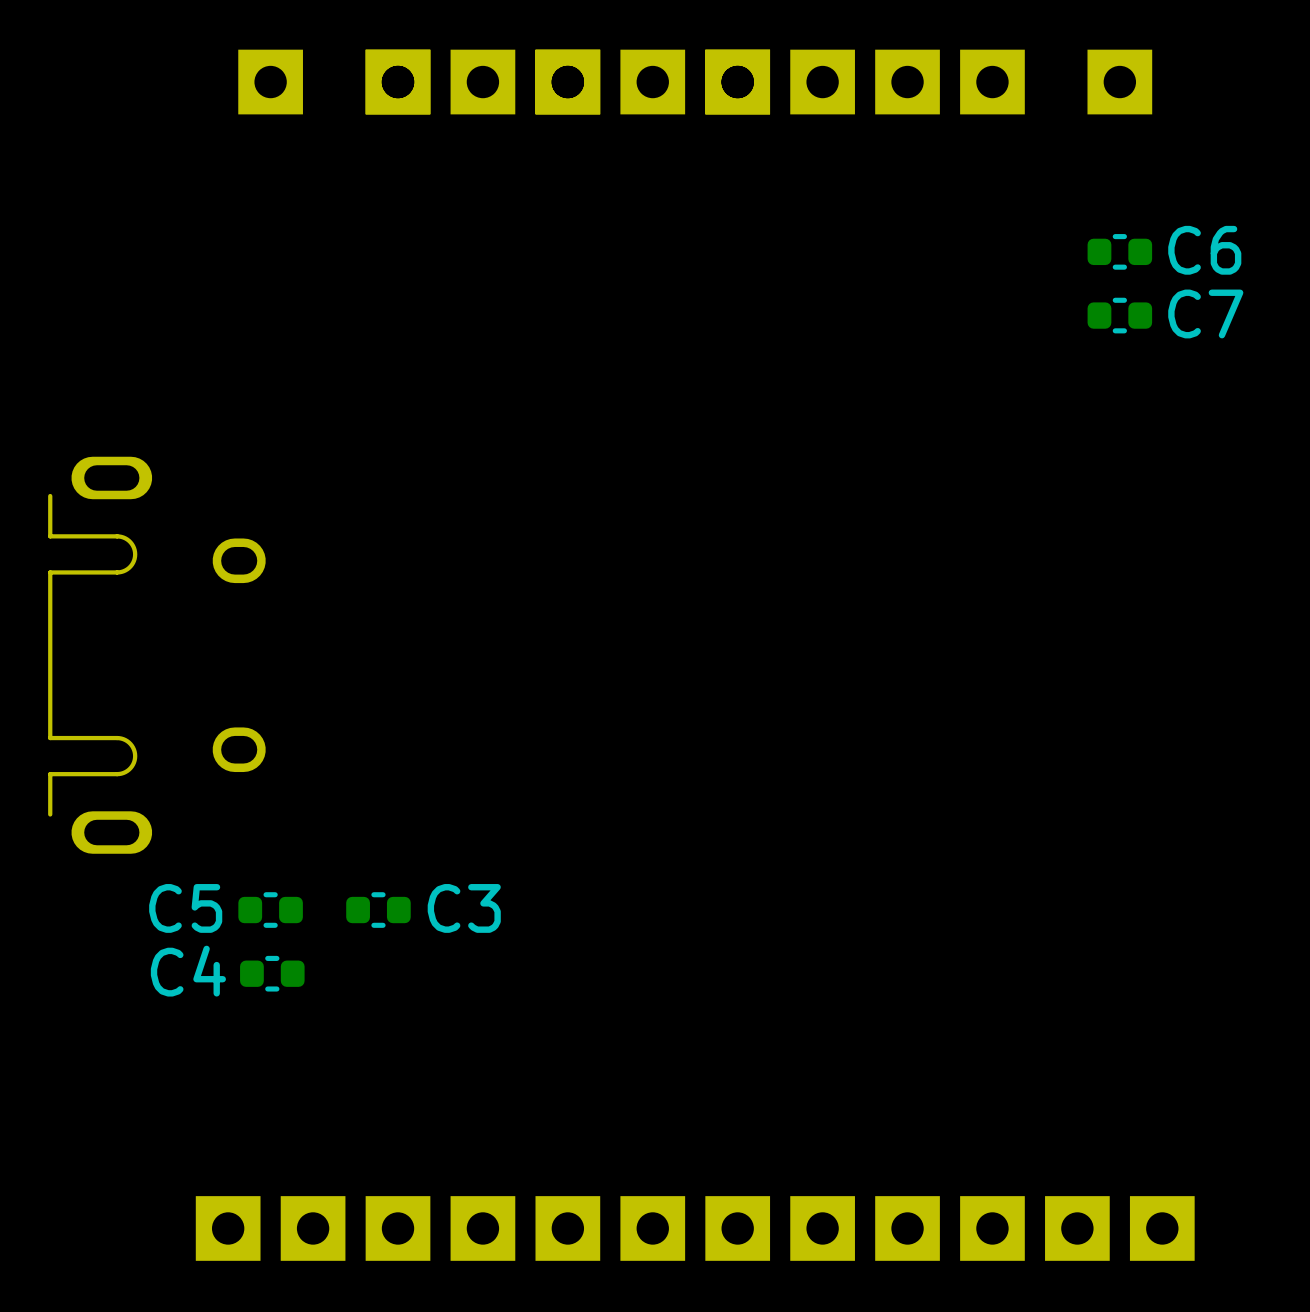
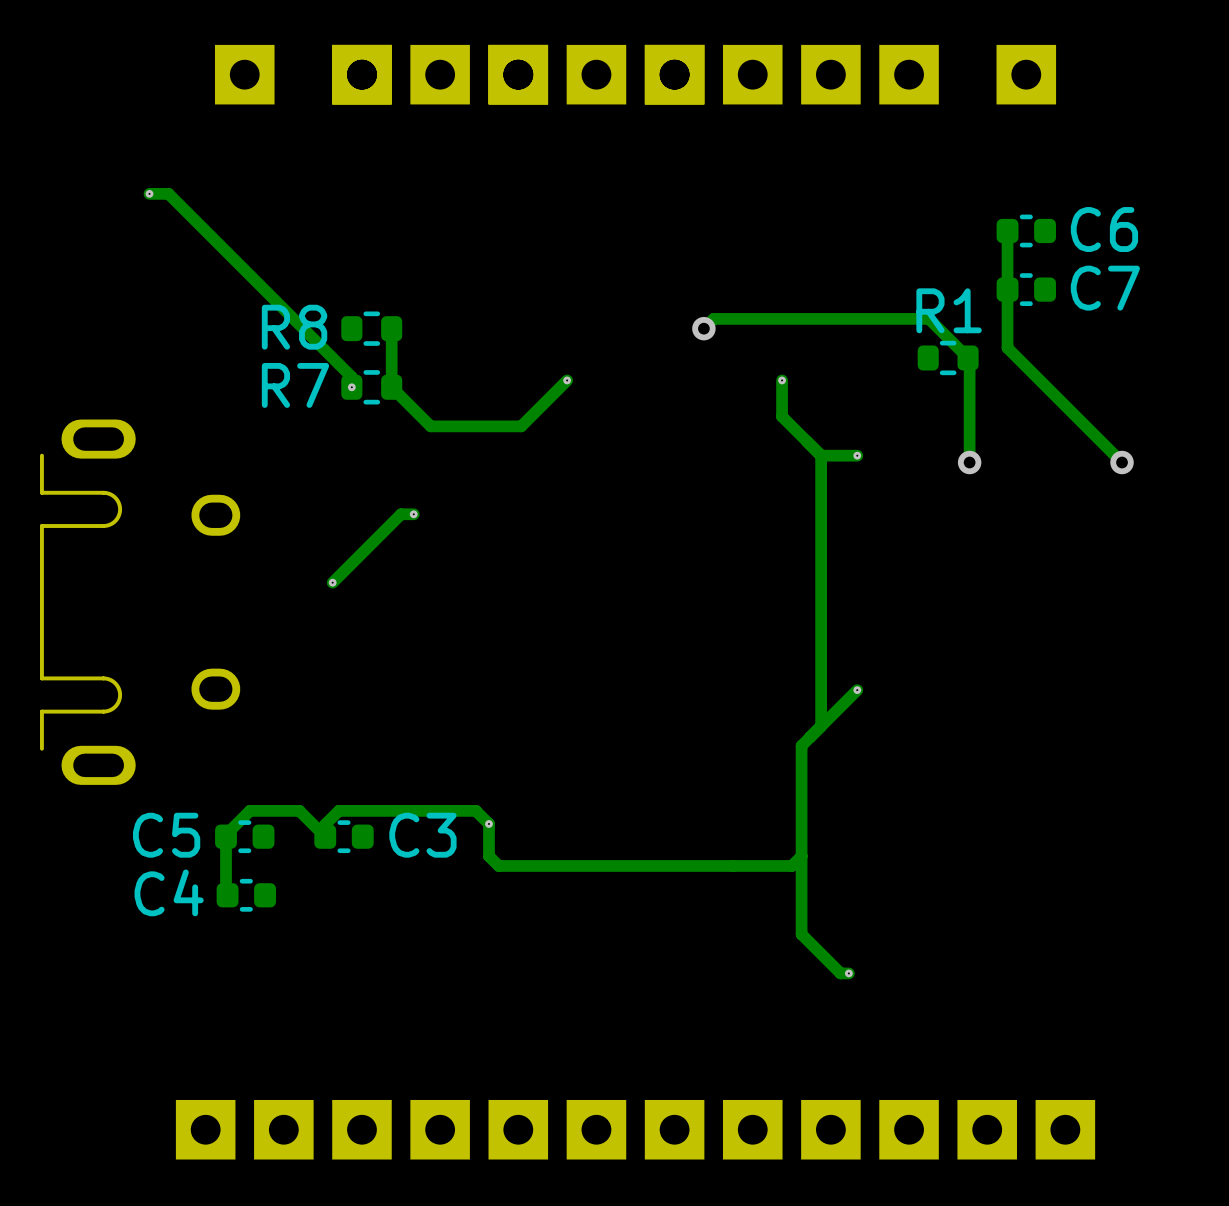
track: none -> (149, 193) (168, 193) (351, 377) (351, 387)
via: none -> (149, 193)
track: none -> (1007, 230) (1007, 348) (1122, 462)
R8: none -> (371, 328)
track: none -> (391, 328) (391, 387) (430, 426) (521, 426) (567, 380)
track: none -> (703, 328) (713, 318) (928, 318) (969, 359) (969, 462)
via: none -> (703, 328)
R1: none -> (948, 357)
via: none -> (567, 380)
track: none -> (782, 380) (782, 416) (821, 455)
via: none -> (782, 380)
via: none -> (351, 387)
R7: none -> (371, 387)
track: none -> (821, 455) (821, 726)
track: none -> (857, 455) (821, 455)
via: none -> (857, 455)
via: none -> (969, 462)
via: none -> (1122, 462)
track: none -> (413, 514) (401, 514) (332, 582)
via: none -> (413, 514)
via: none -> (332, 582)
track: none -> (857, 690) (801, 745) (801, 934) (840, 973) (848, 973)
via: none -> (857, 690)
via: none -> (488, 823)
track: none -> (801, 856) (791, 865) (498, 865) (488, 856) (488, 823) (475, 810) (338, 810) (325, 824) (325, 836) (299, 810) (249, 810) (226, 834) (226, 893) (227, 895)
via: none -> (848, 973)

